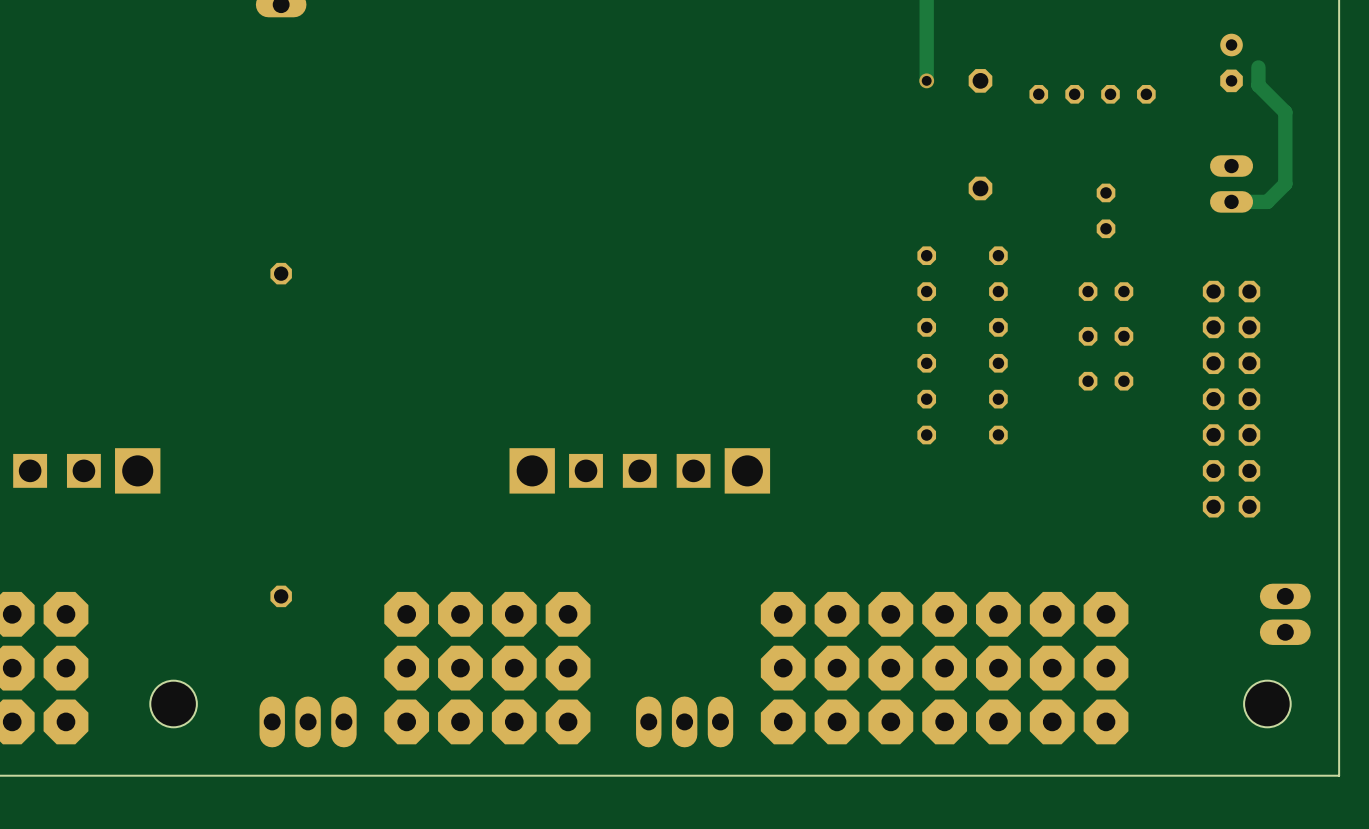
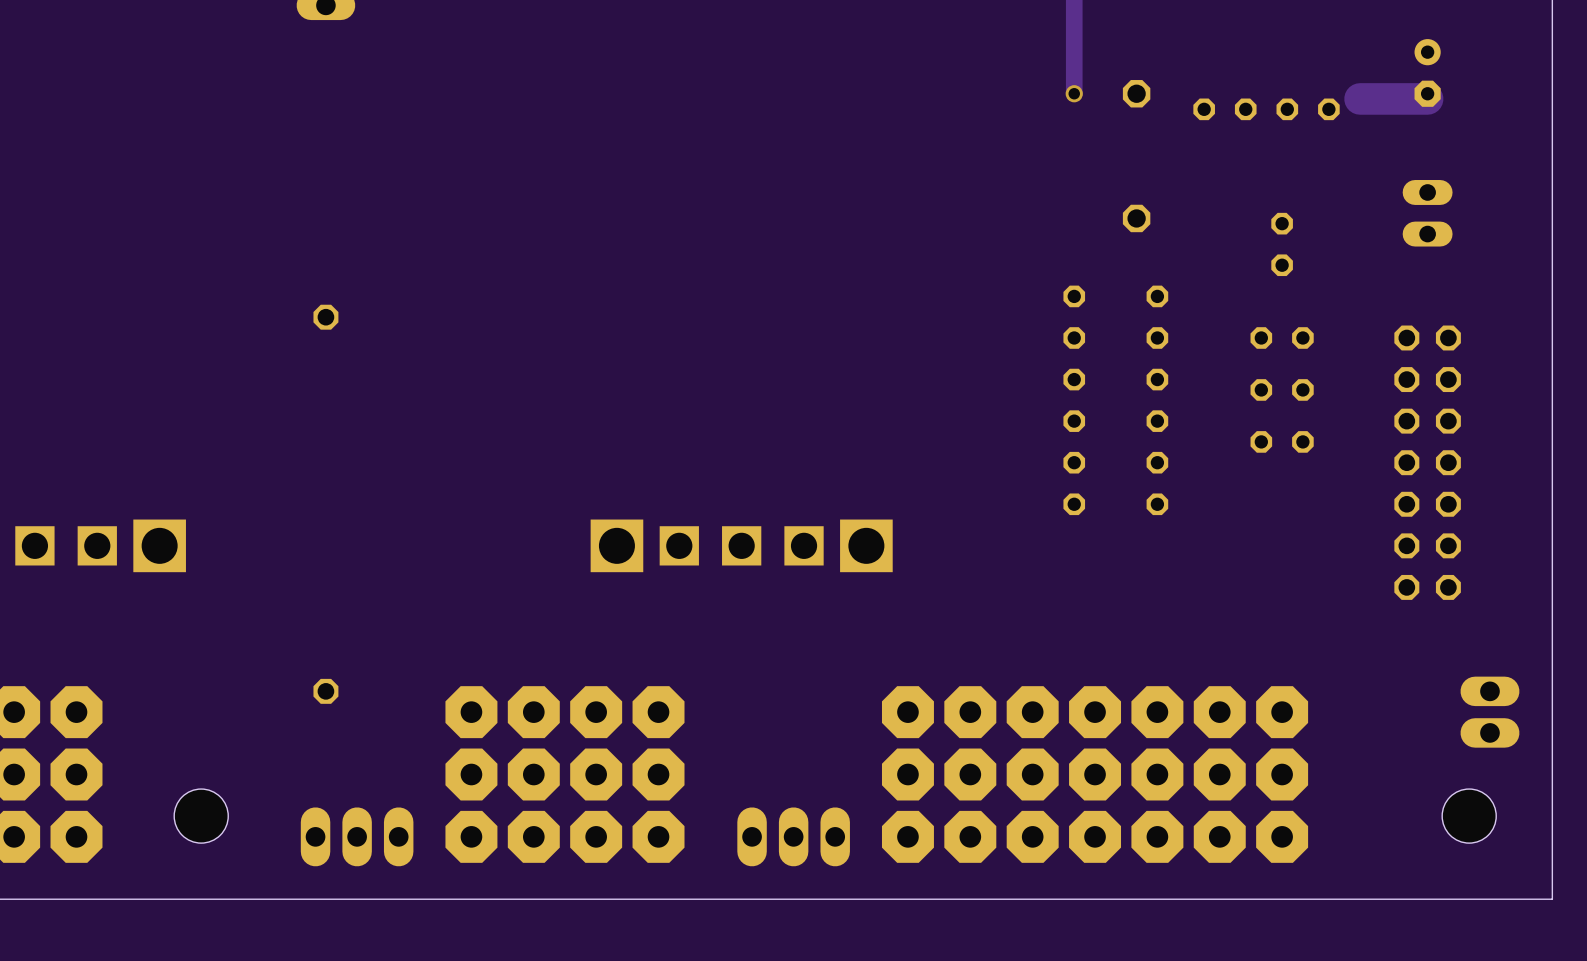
track: (1258, 67) (1258, 85) (1285, 112) (1285, 183) (1267, 201) (1231, 201) -> none
track: none -> (1427, 98) (1360, 98)

